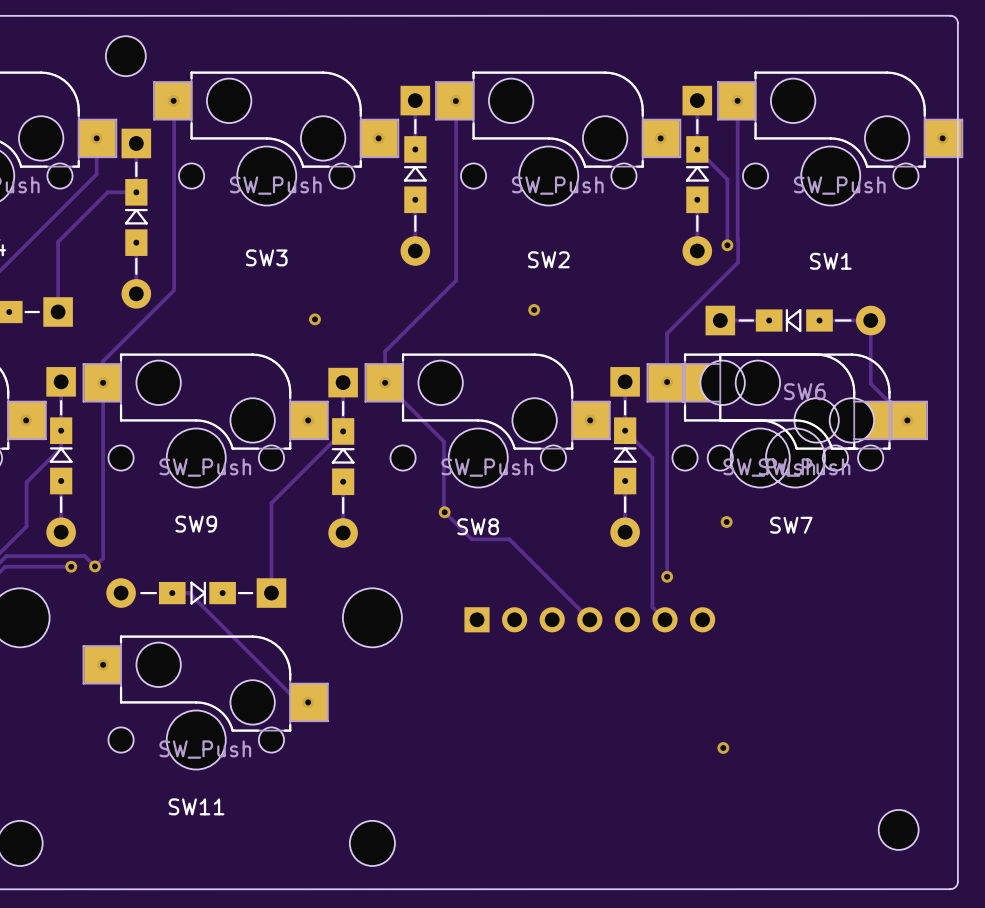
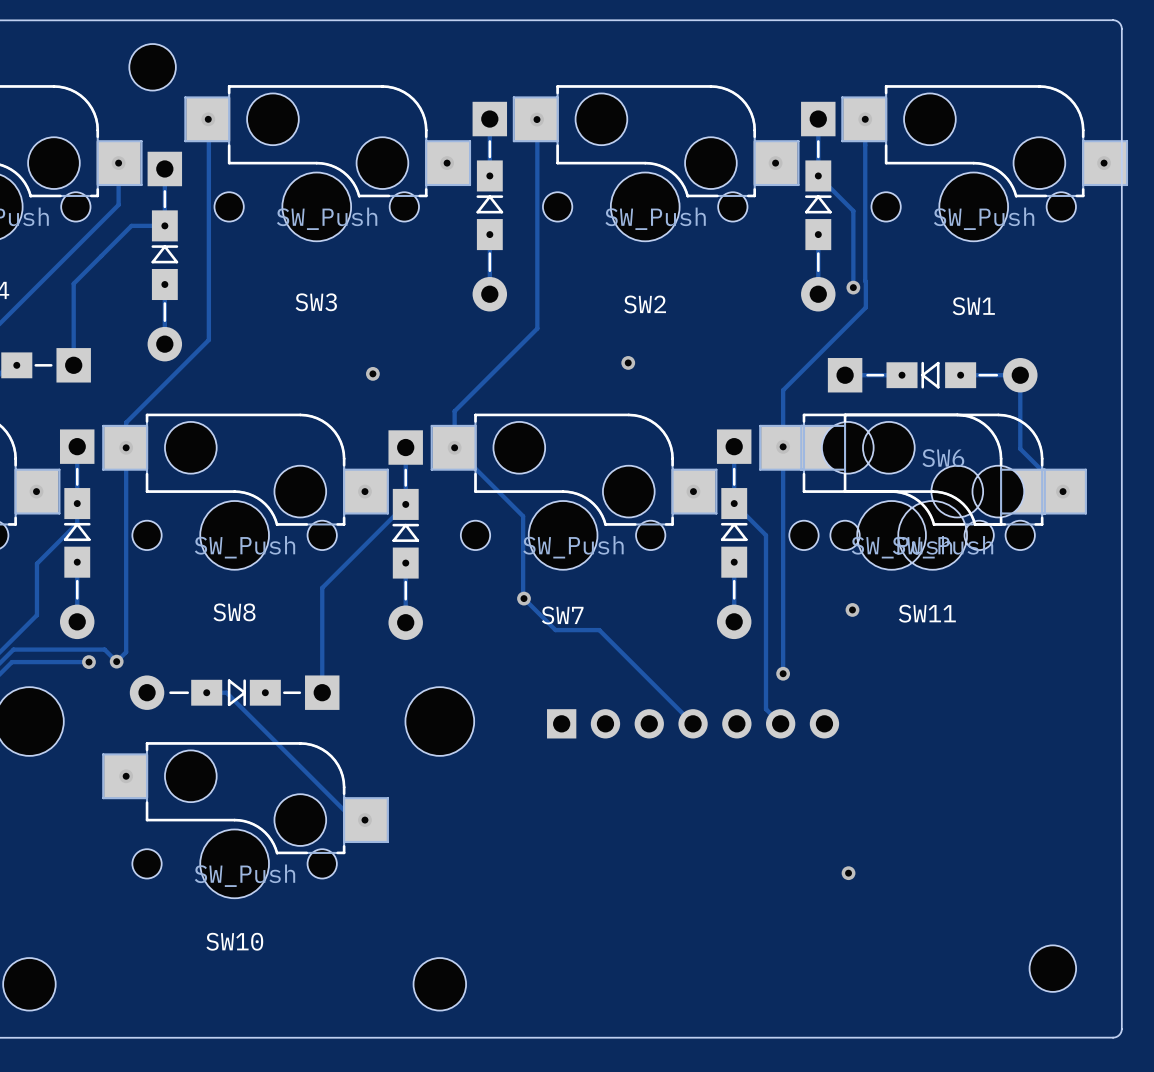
SW9 name: SW9 (196, 524) -> SW8 (234, 612)
SW7 name: SW7 (791, 525) -> SW11 (927, 613)
SW8 name: SW8 (478, 526) -> SW7 (562, 615)
SW11 name: SW11 (196, 806) -> SW10 (234, 941)

